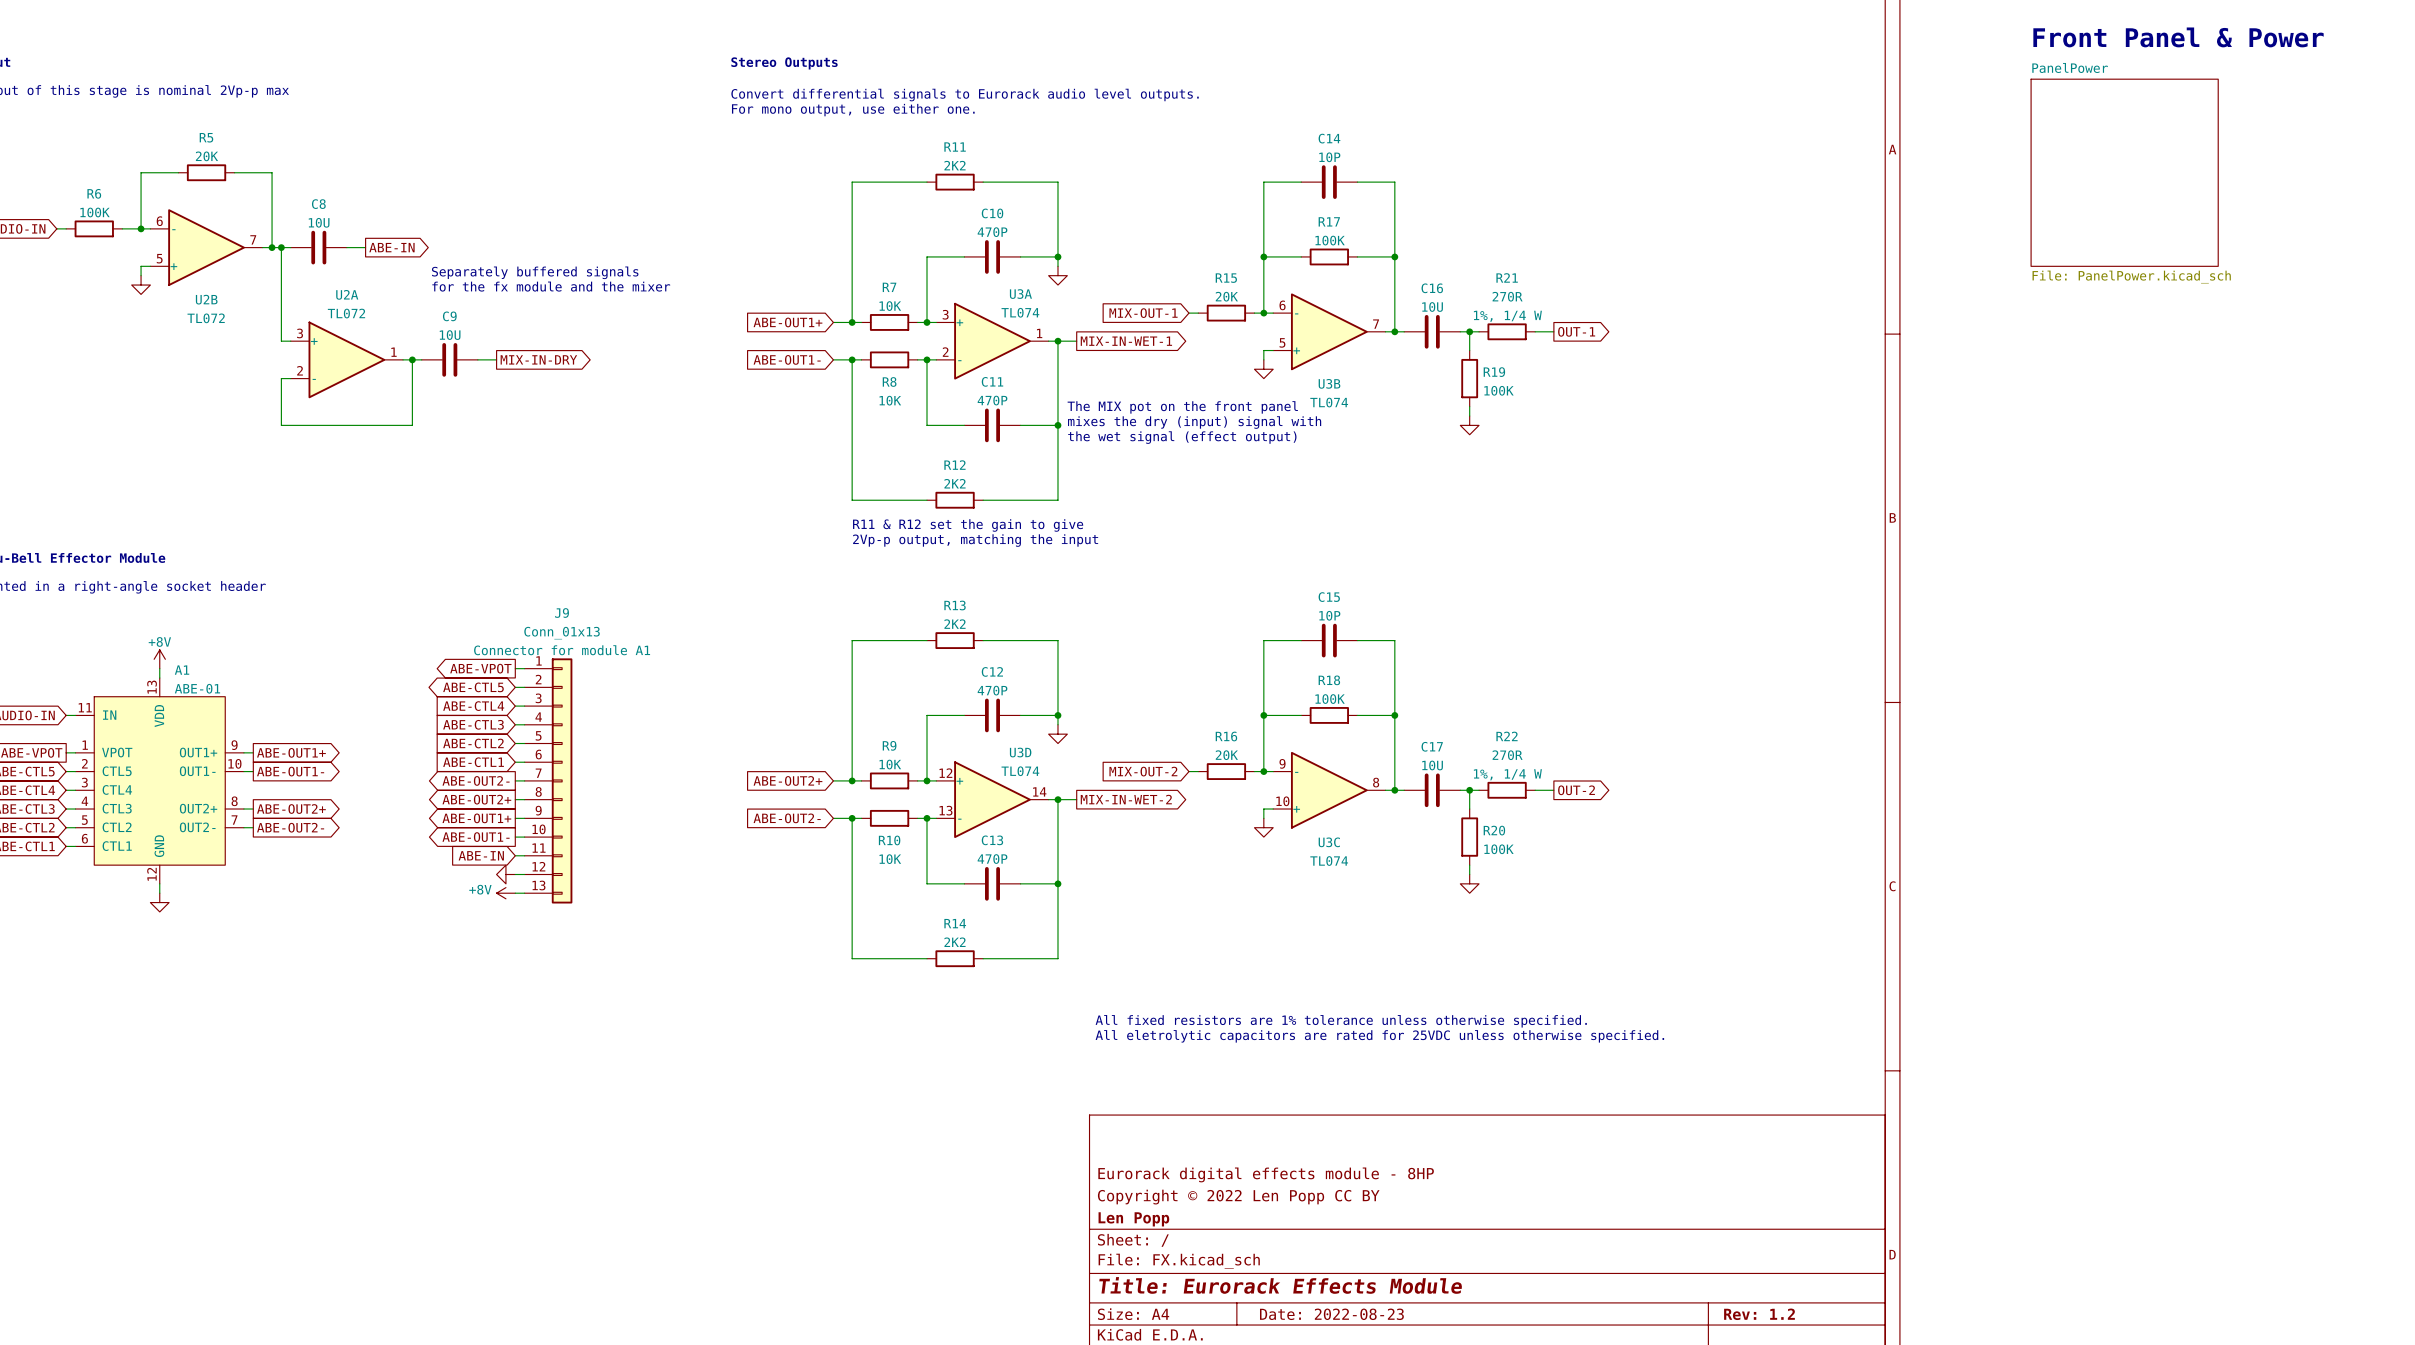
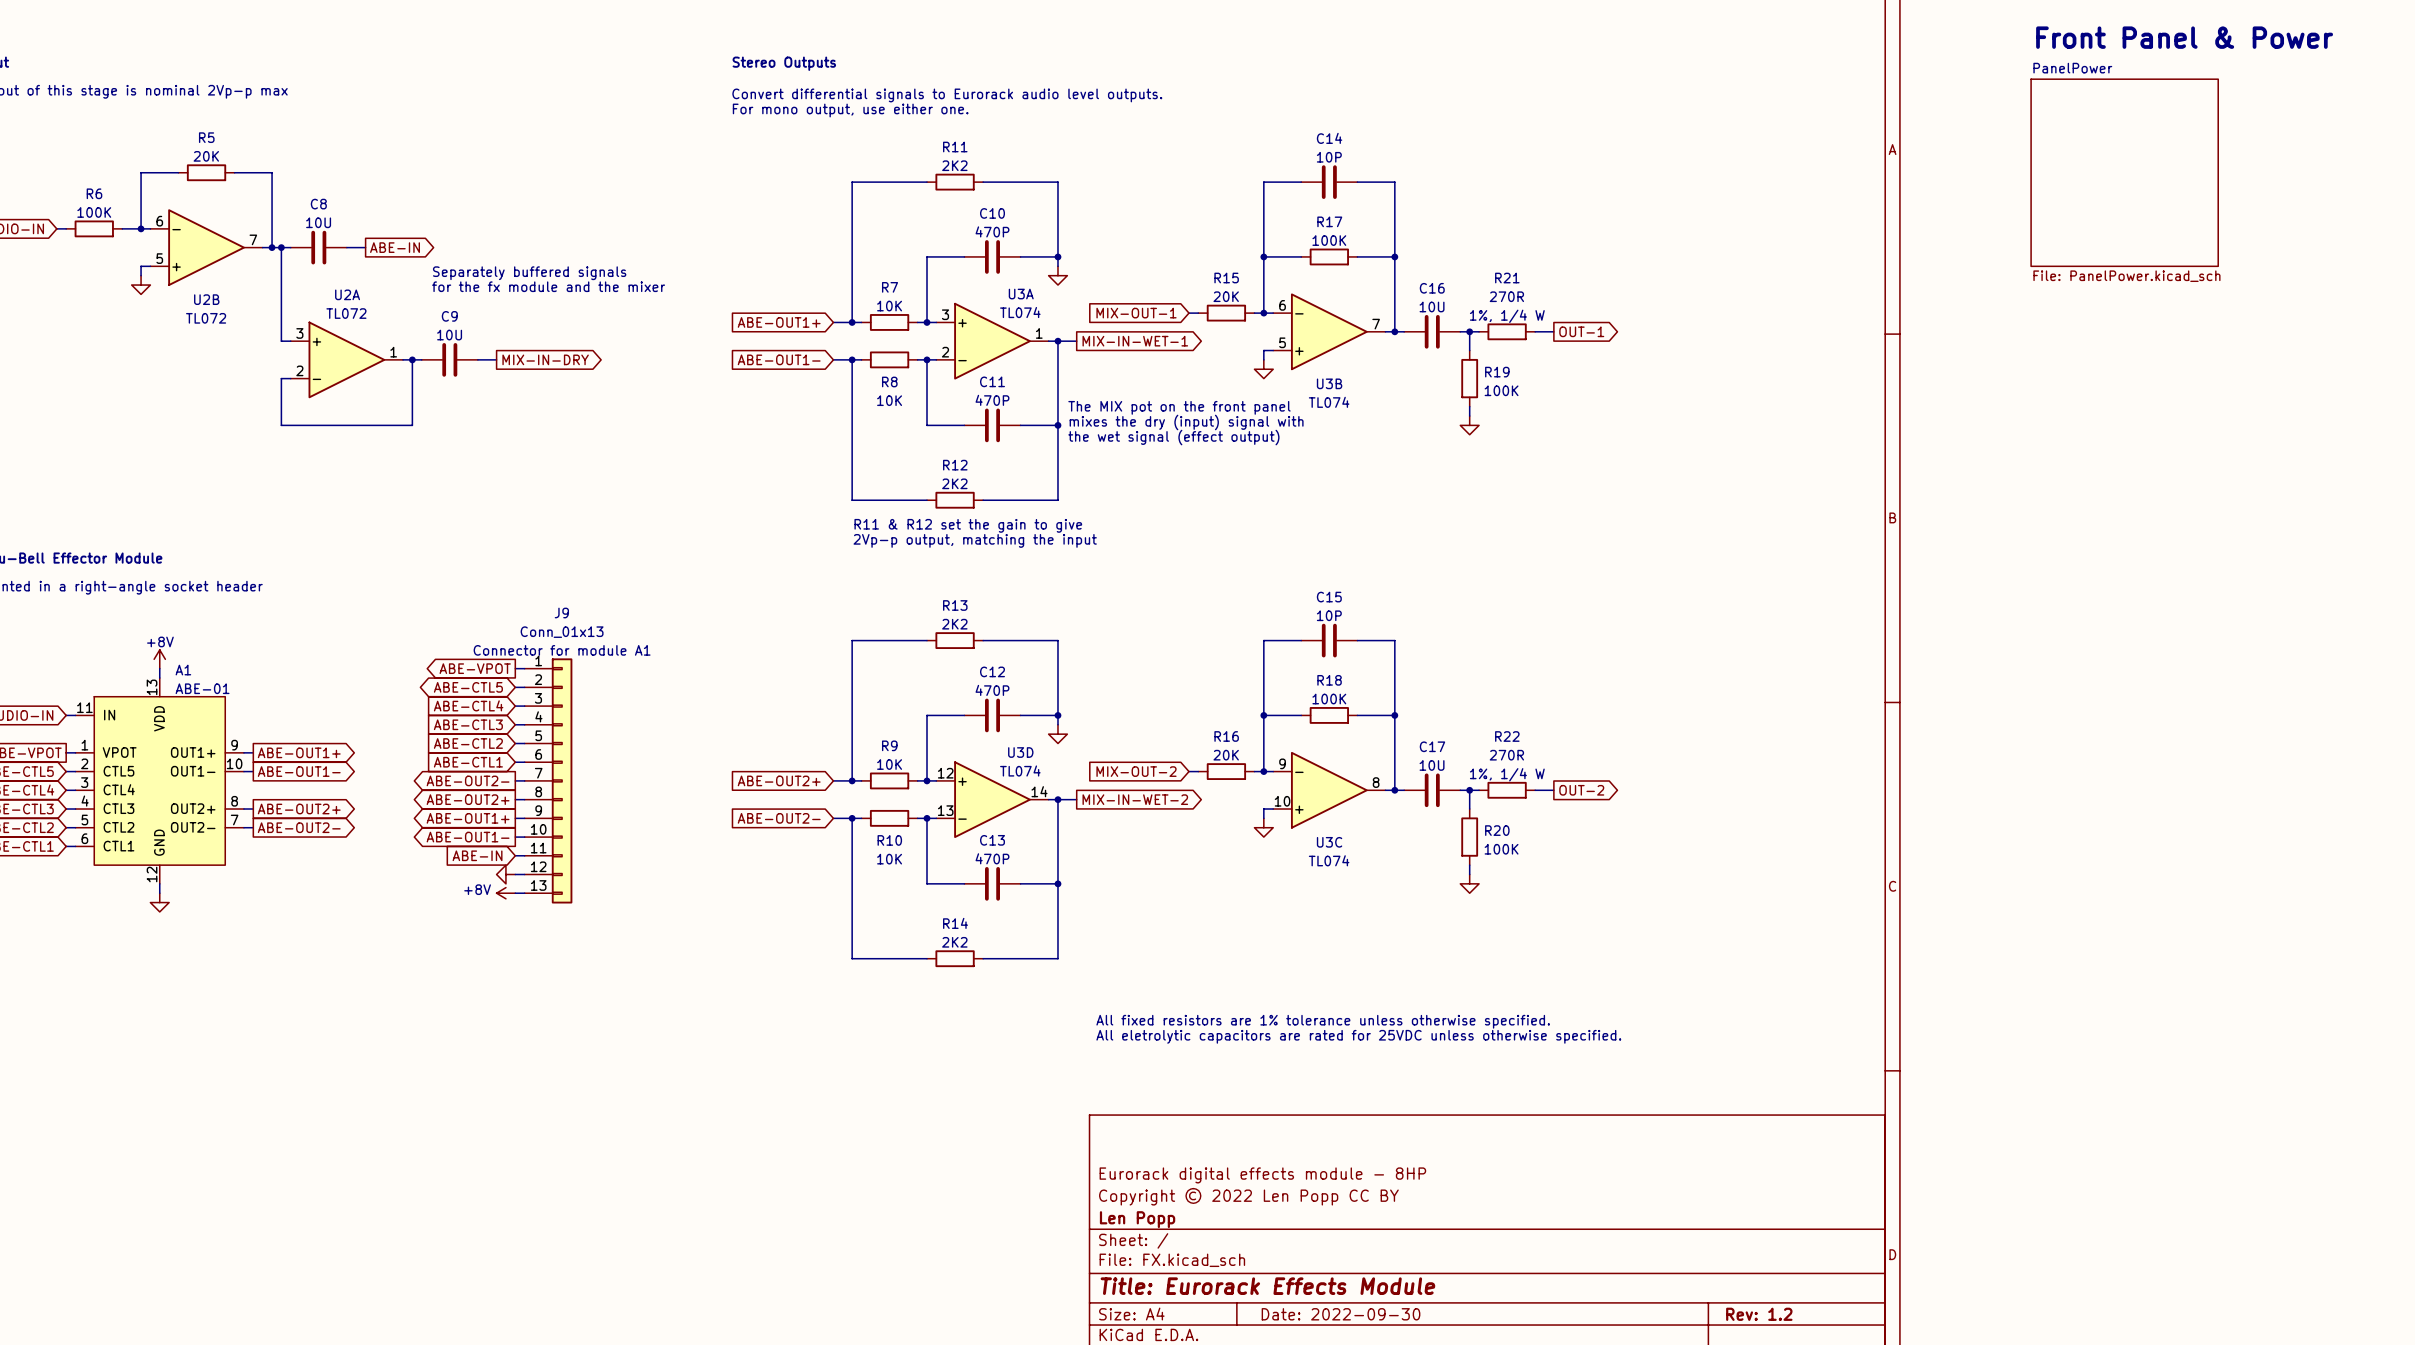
title block: Date: 2022-08-23 (1331, 1314) -> Date: 2022-09-30 (1341, 1314)

